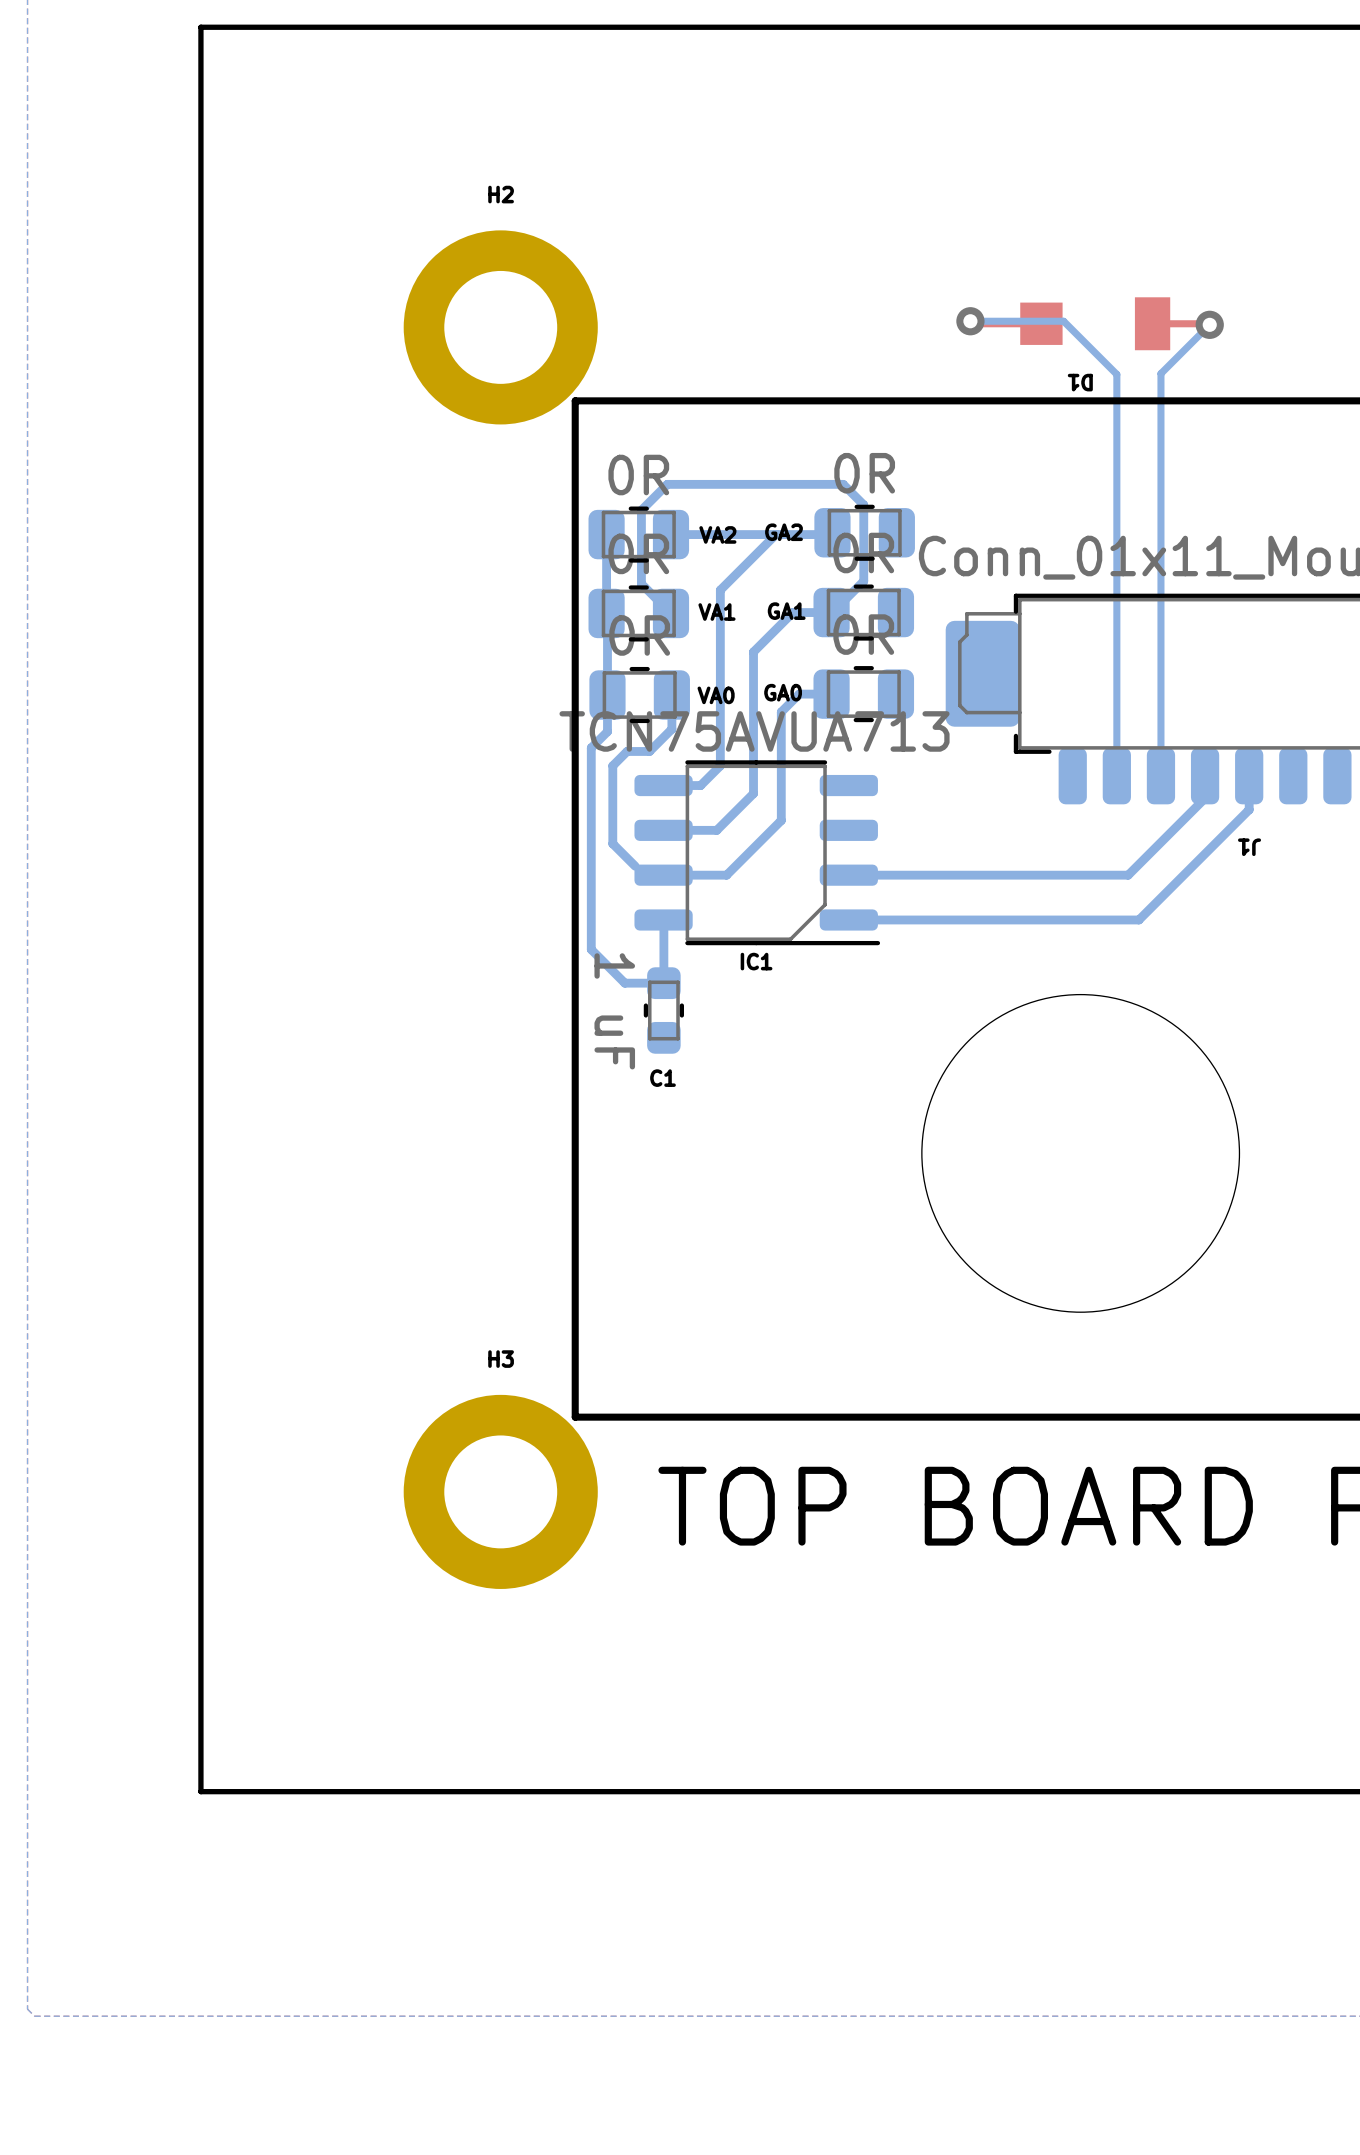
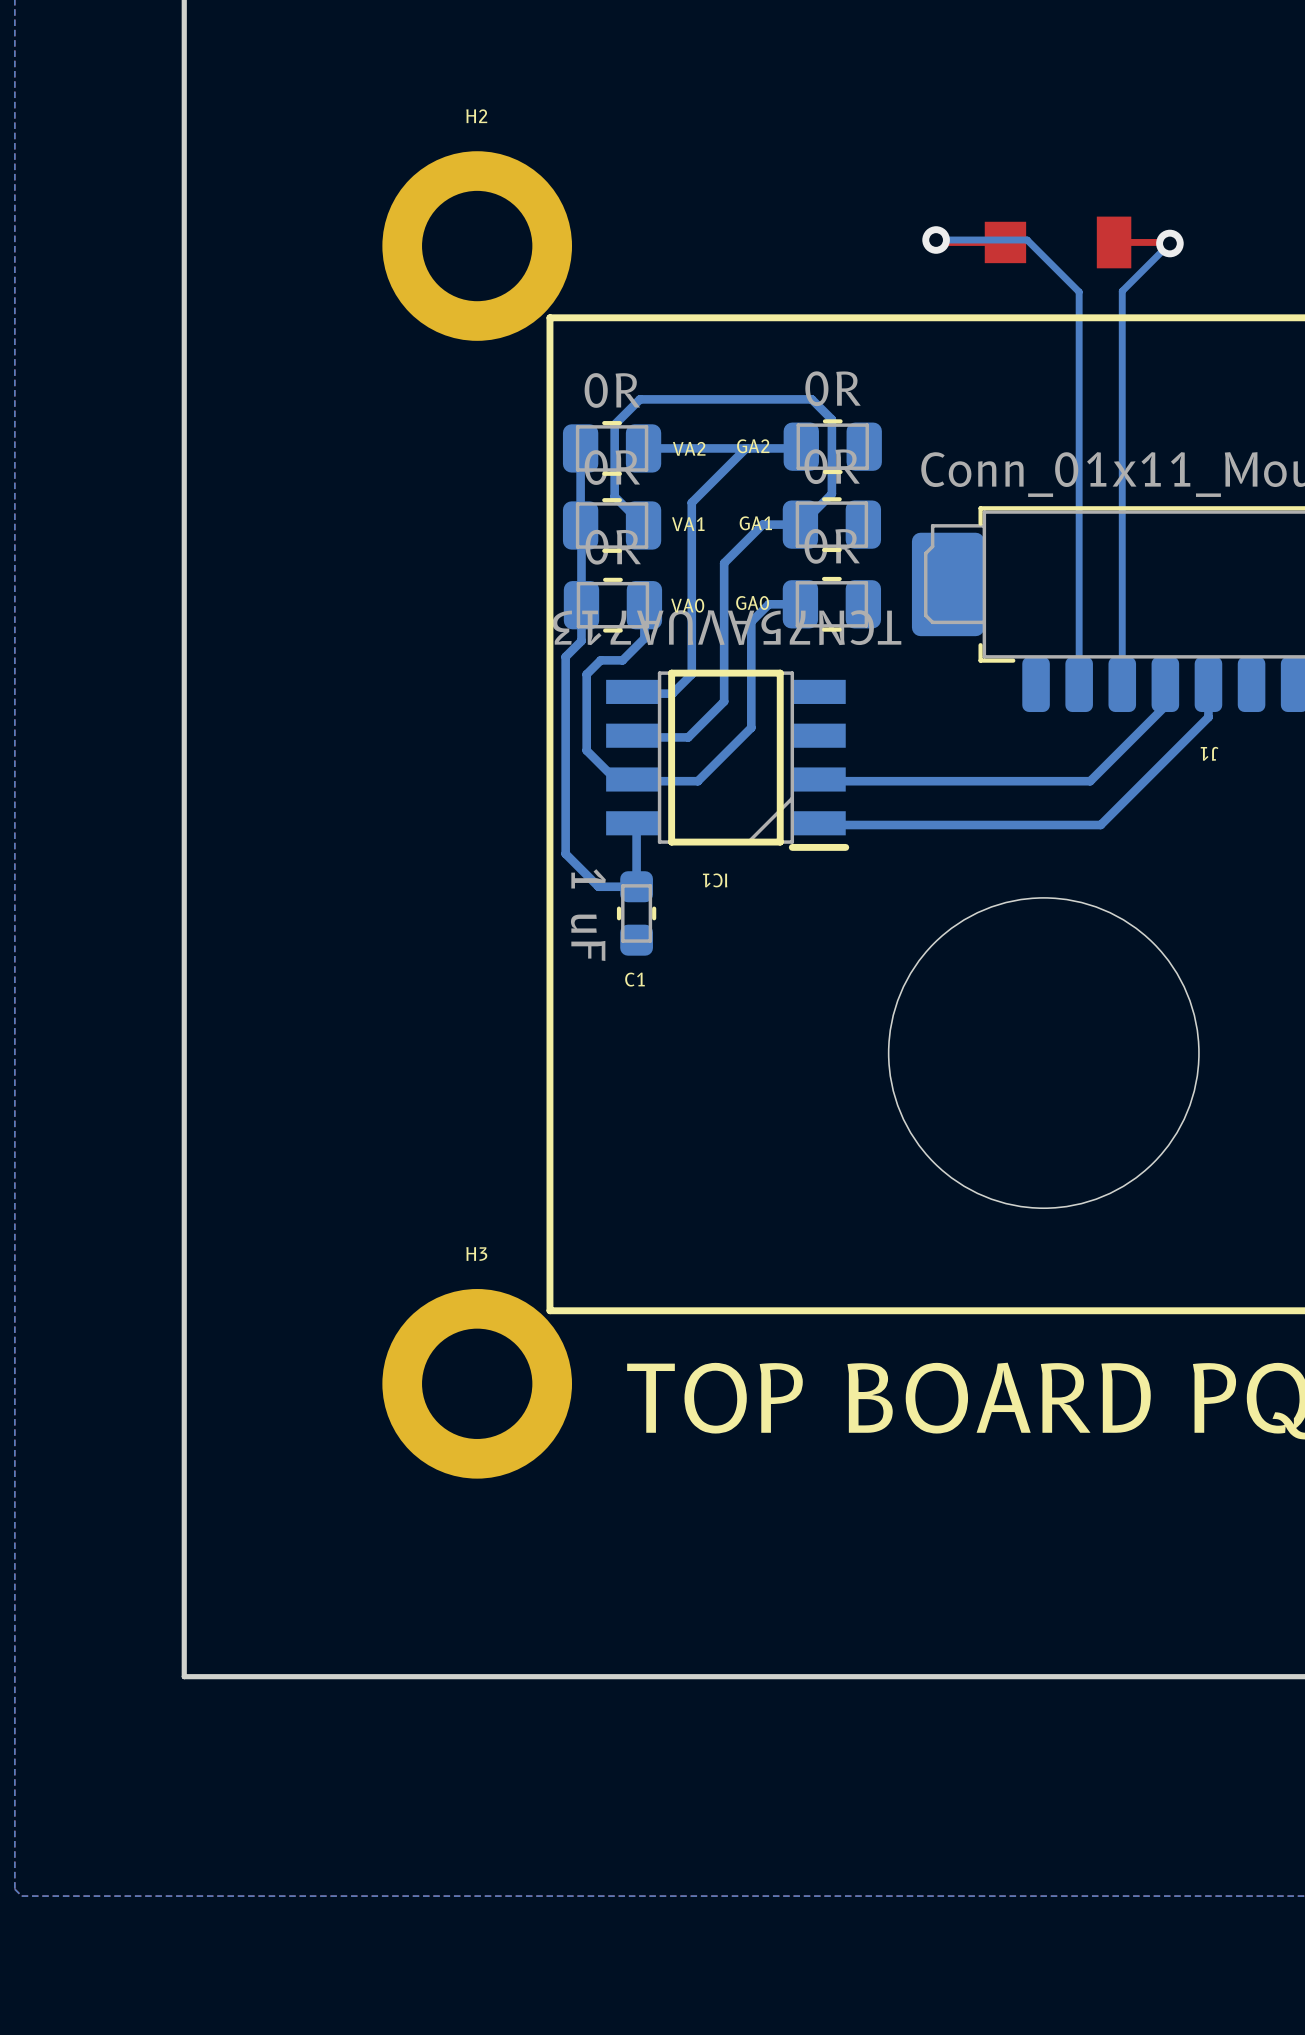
D1 name: D1 (1080, 382) -> none
IC1 footprint: [634, 760, 881, 946] -> [606, 669, 850, 851]

